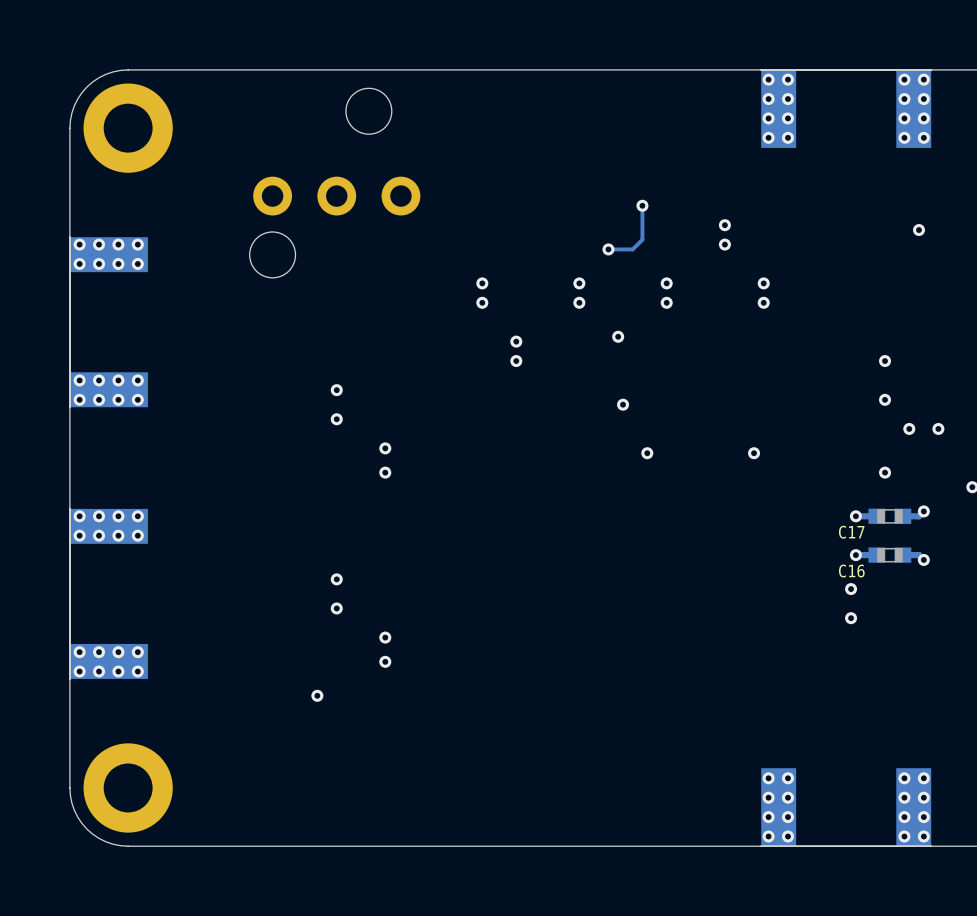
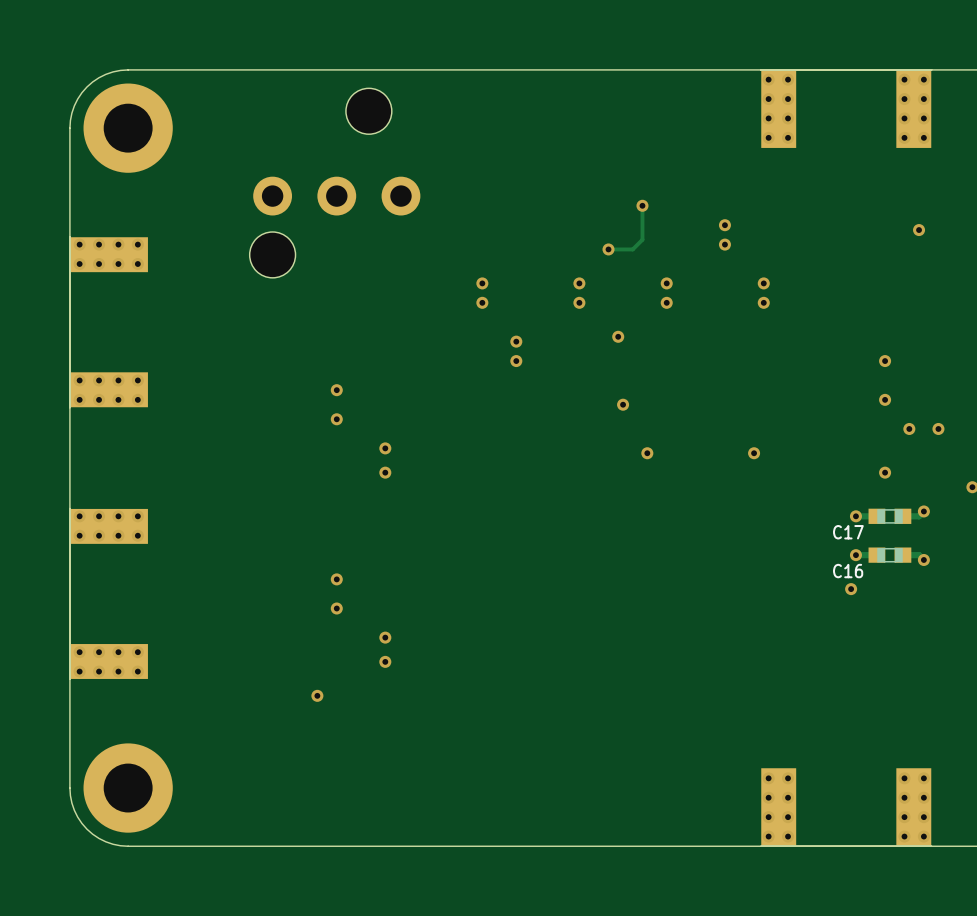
via: (851, 618) -> none

